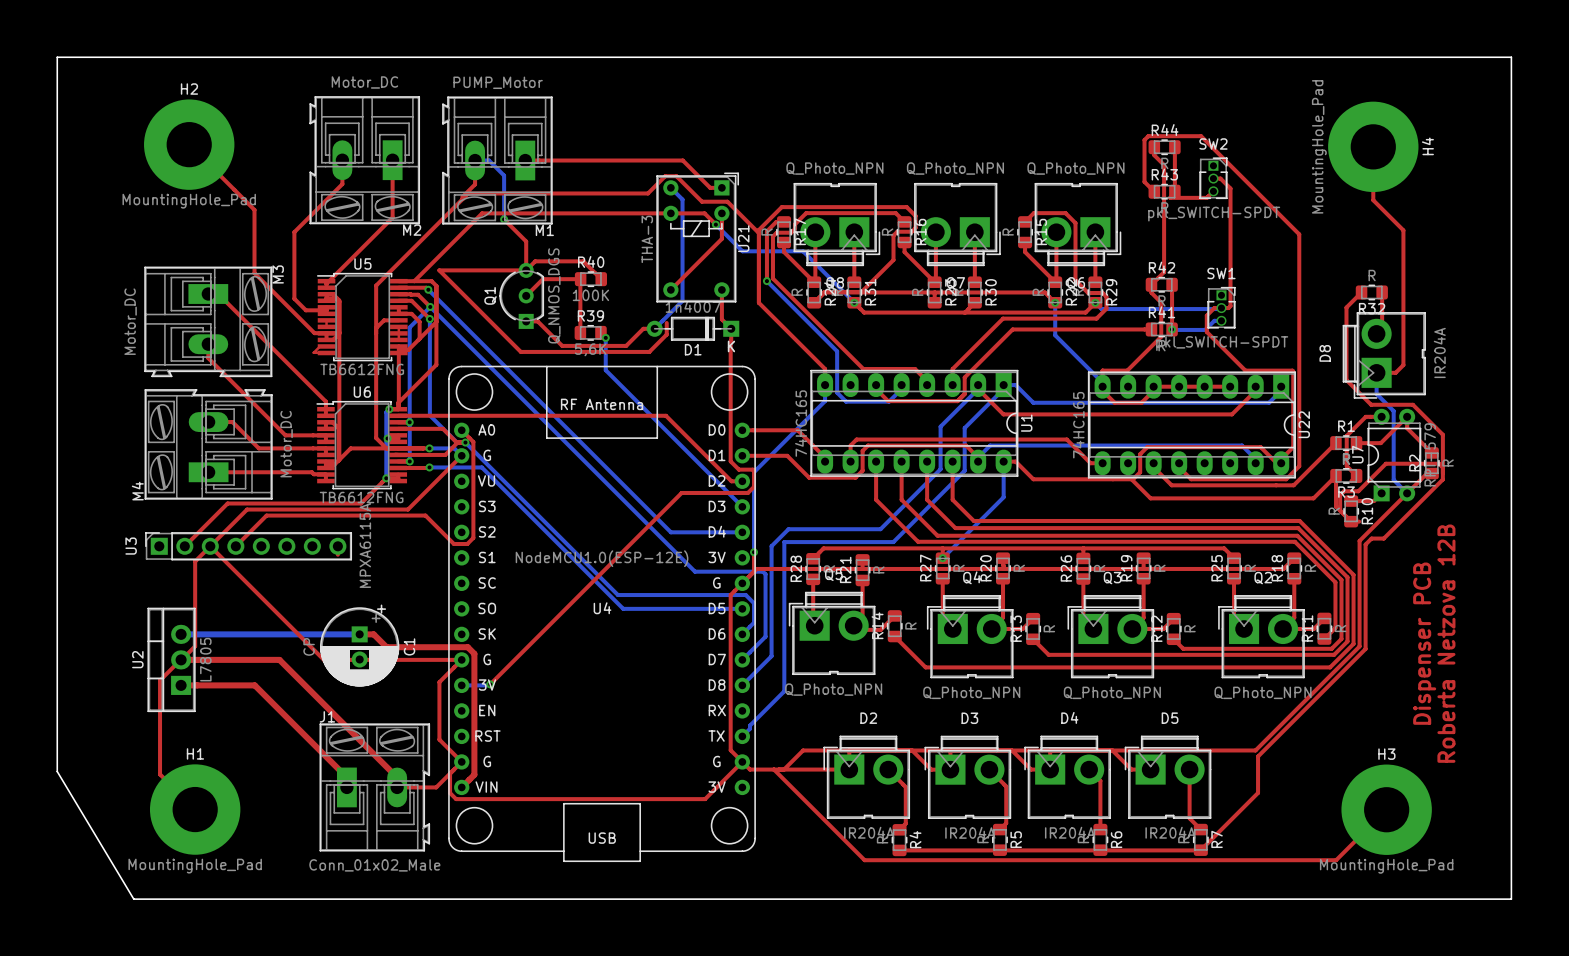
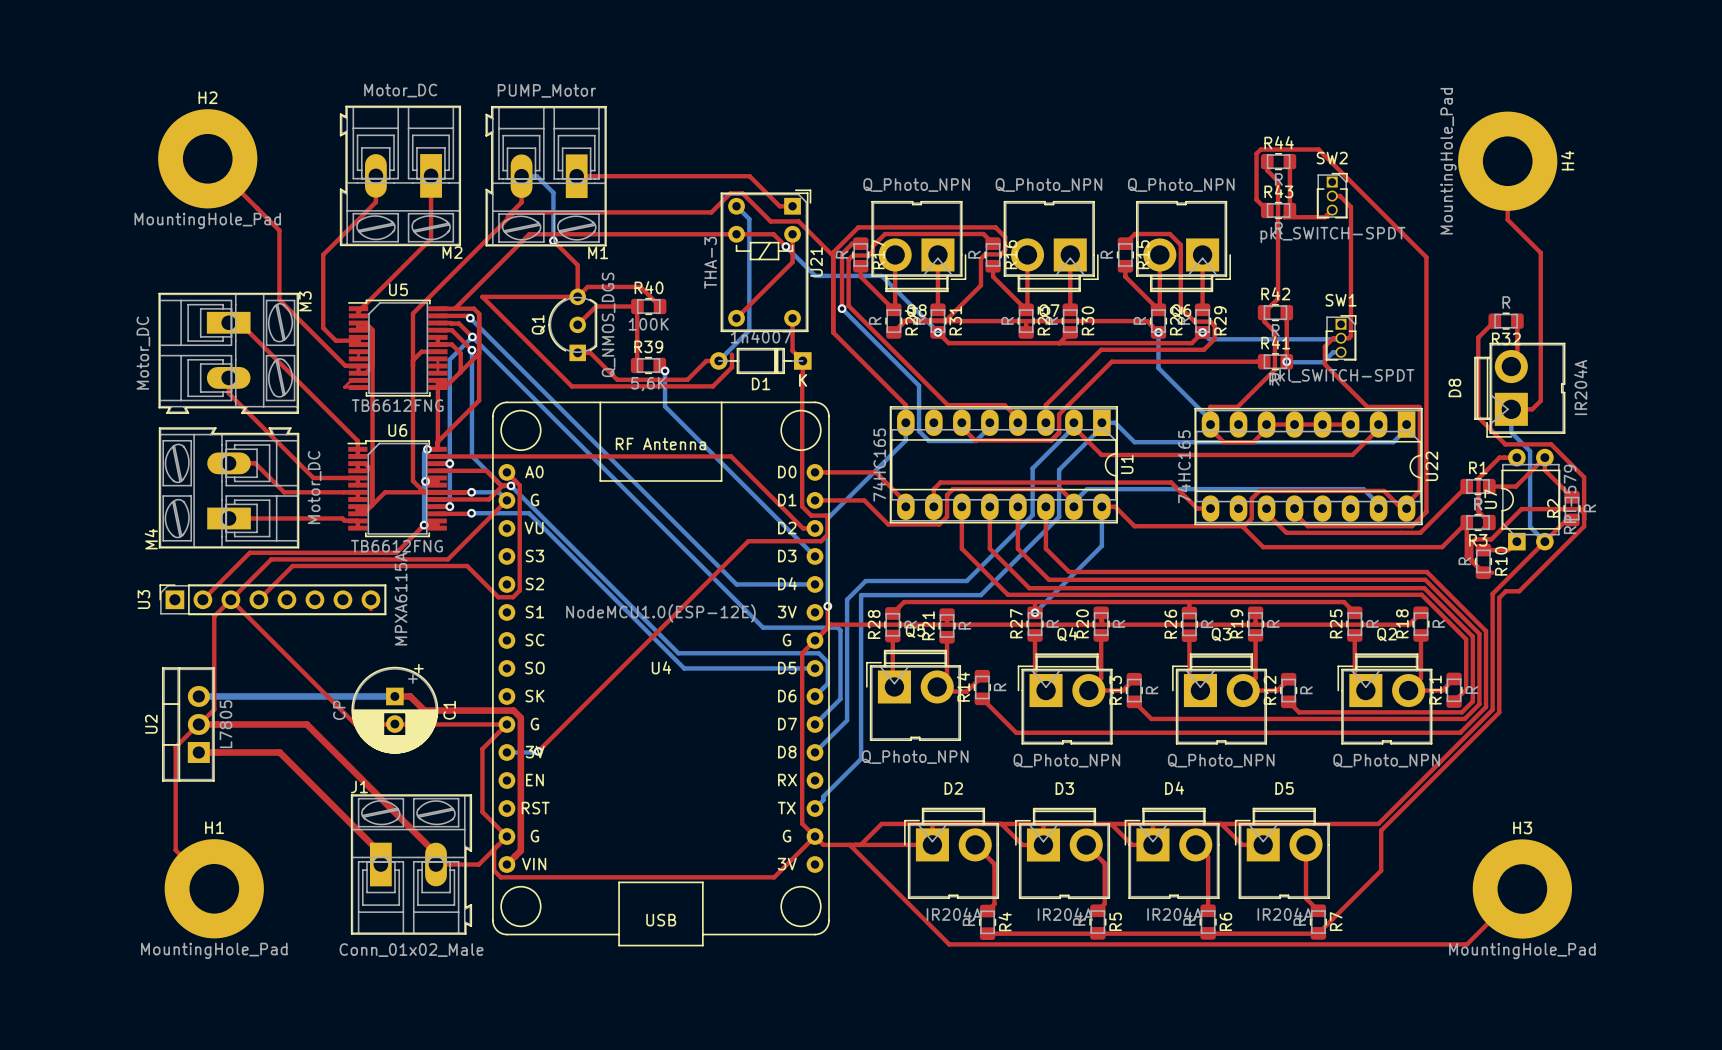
board edge: (57, 57) (1511, 57) (1511, 899) (133, 899) (57, 771) (57, 57) -> none
text: Dispenser PCB (1424, 643) -> none
text: Roberta Netzova 12B (1446, 643) -> none

